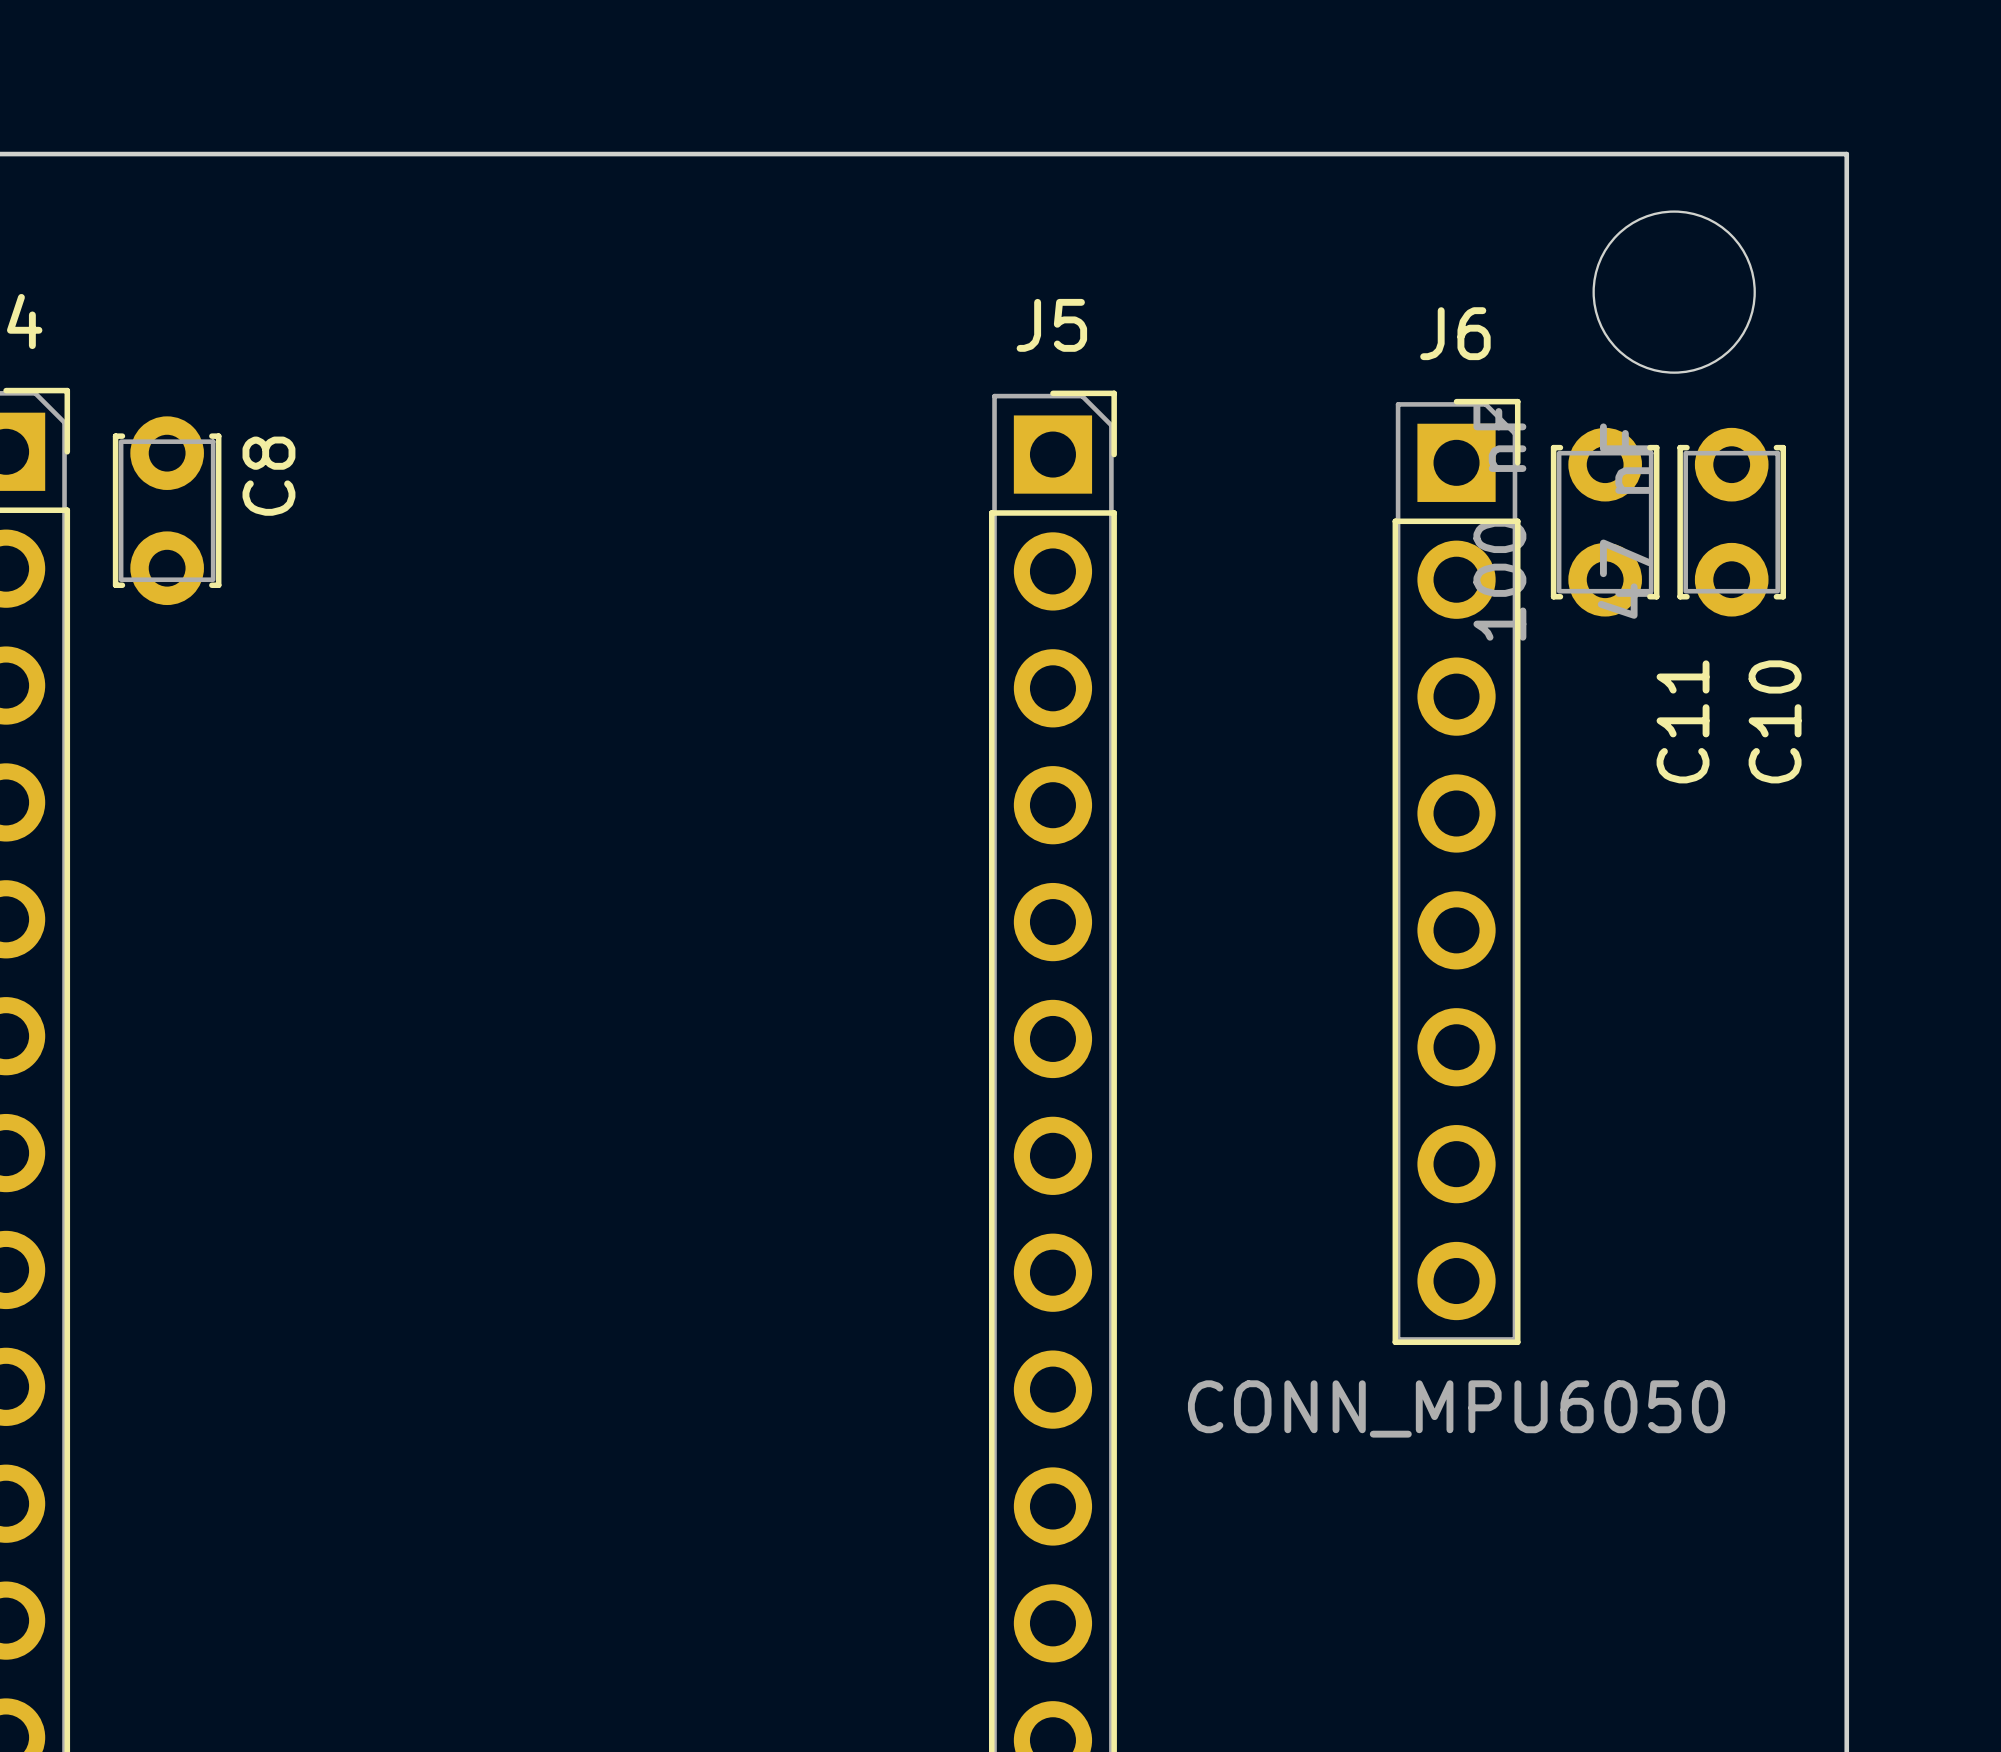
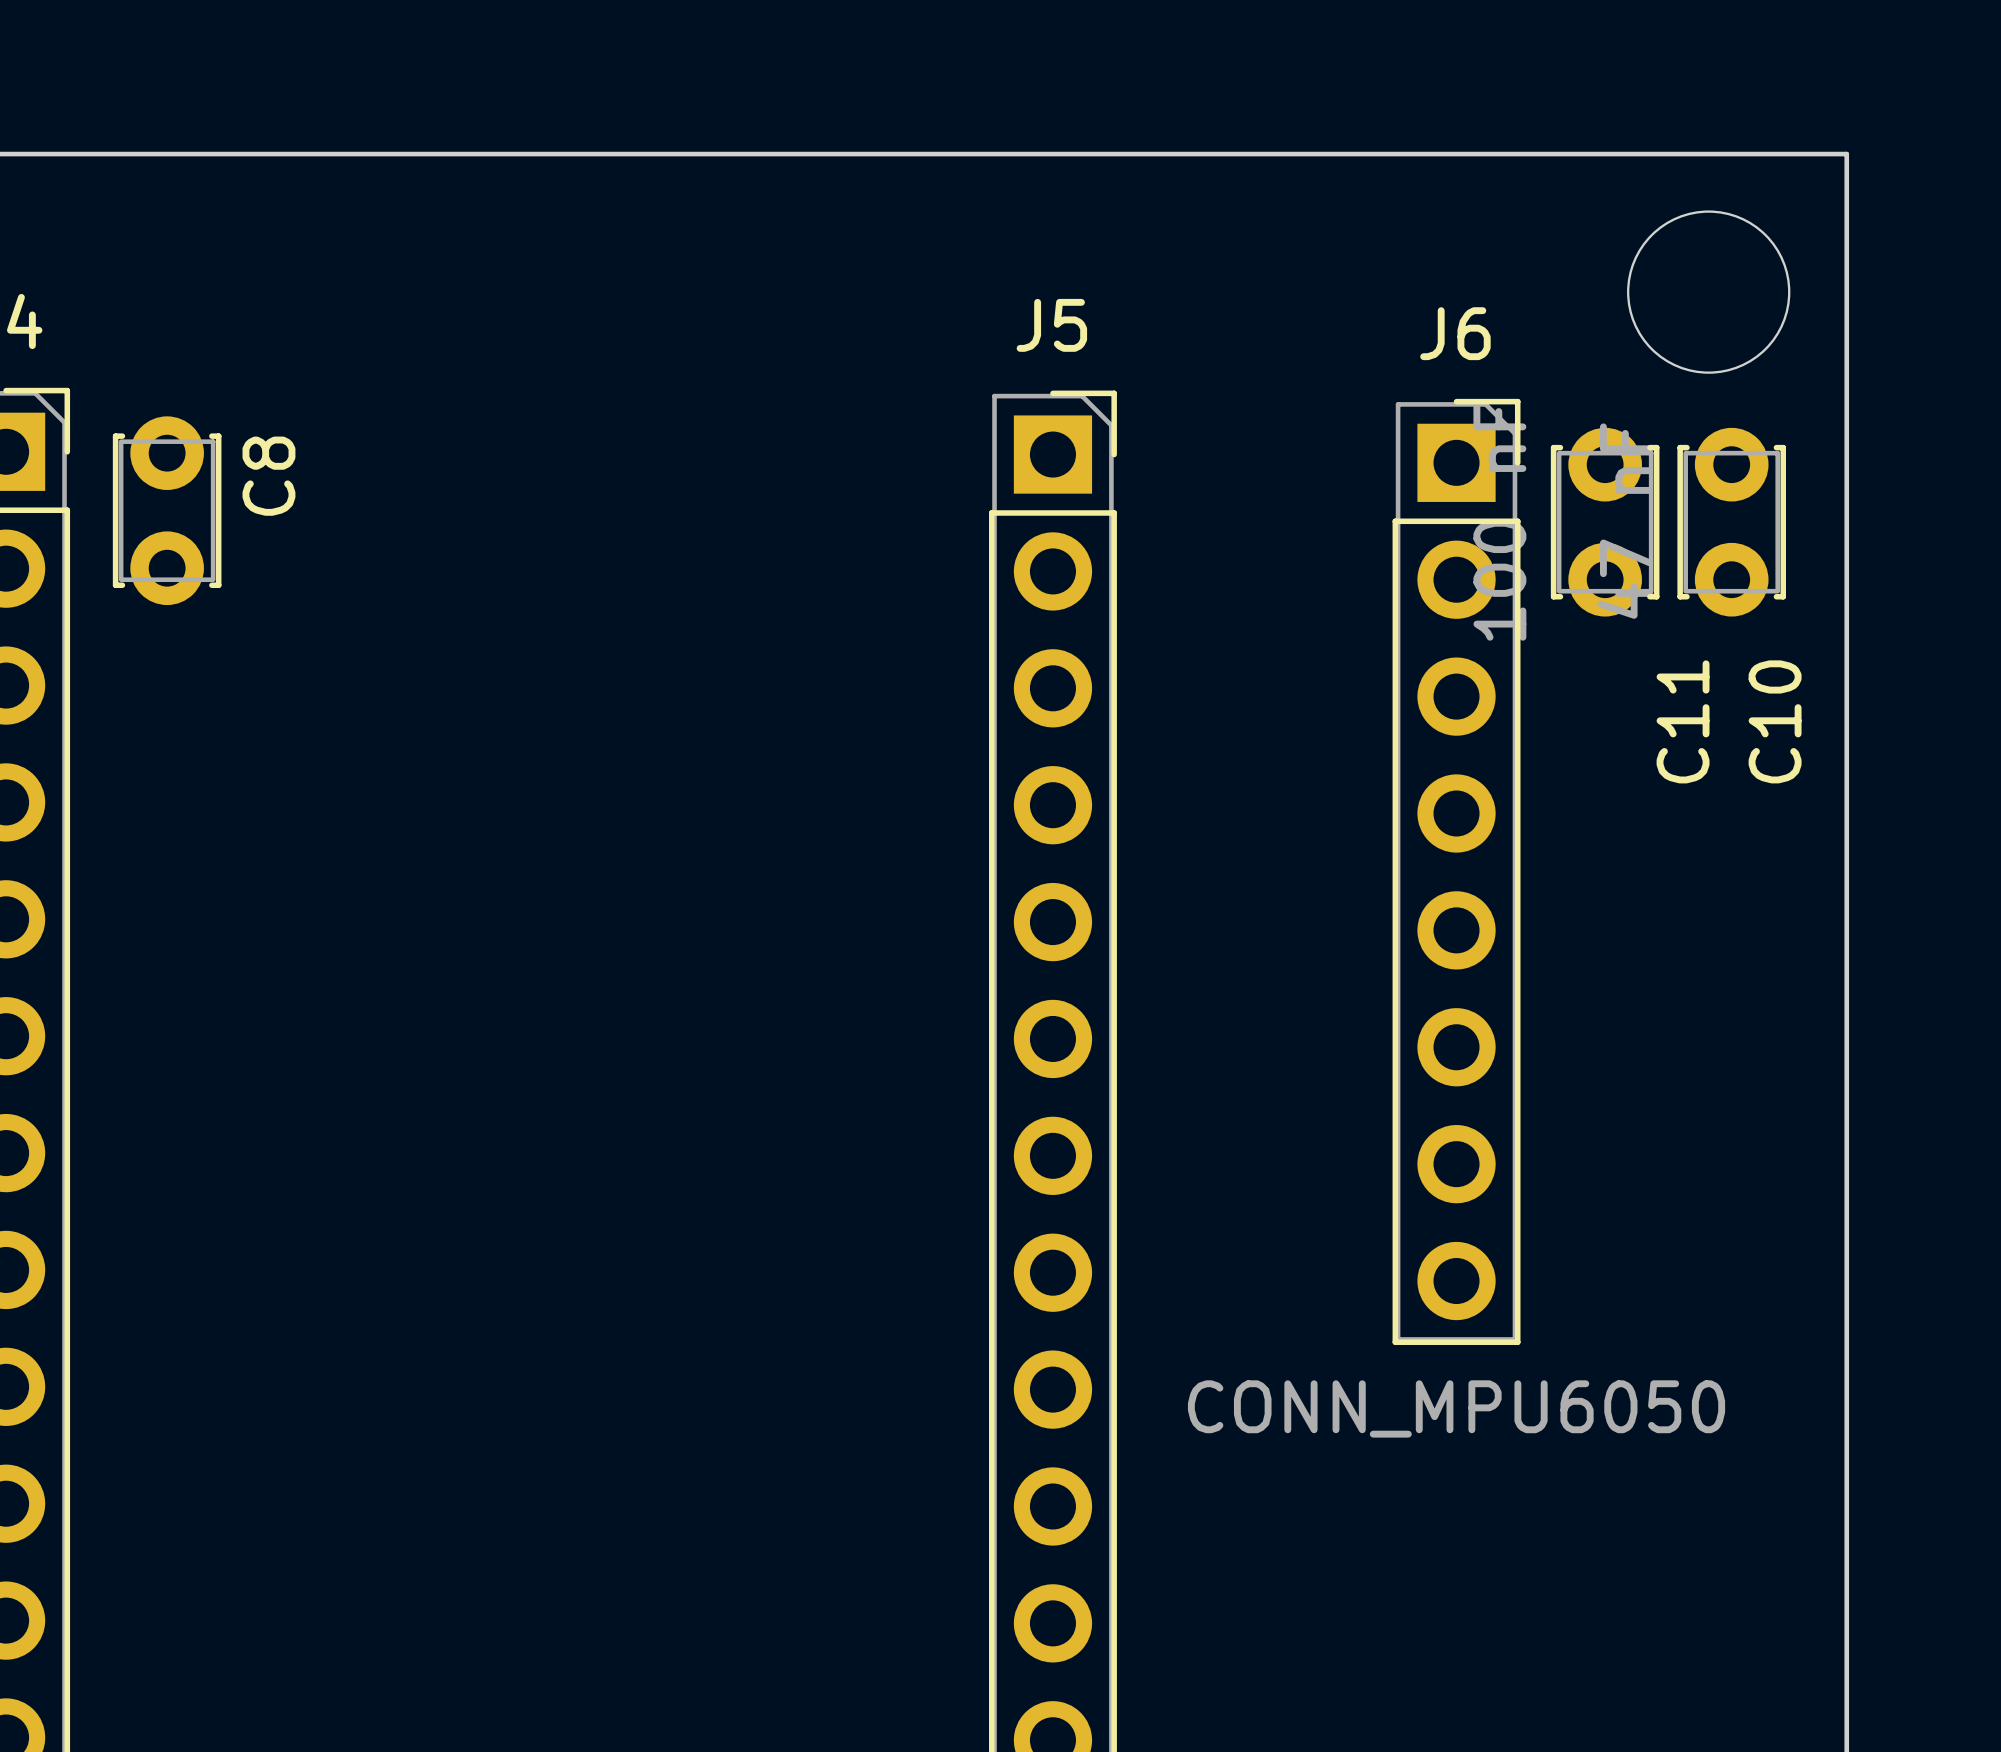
round board edge position: (1674, 292) -> (1708, 292)

